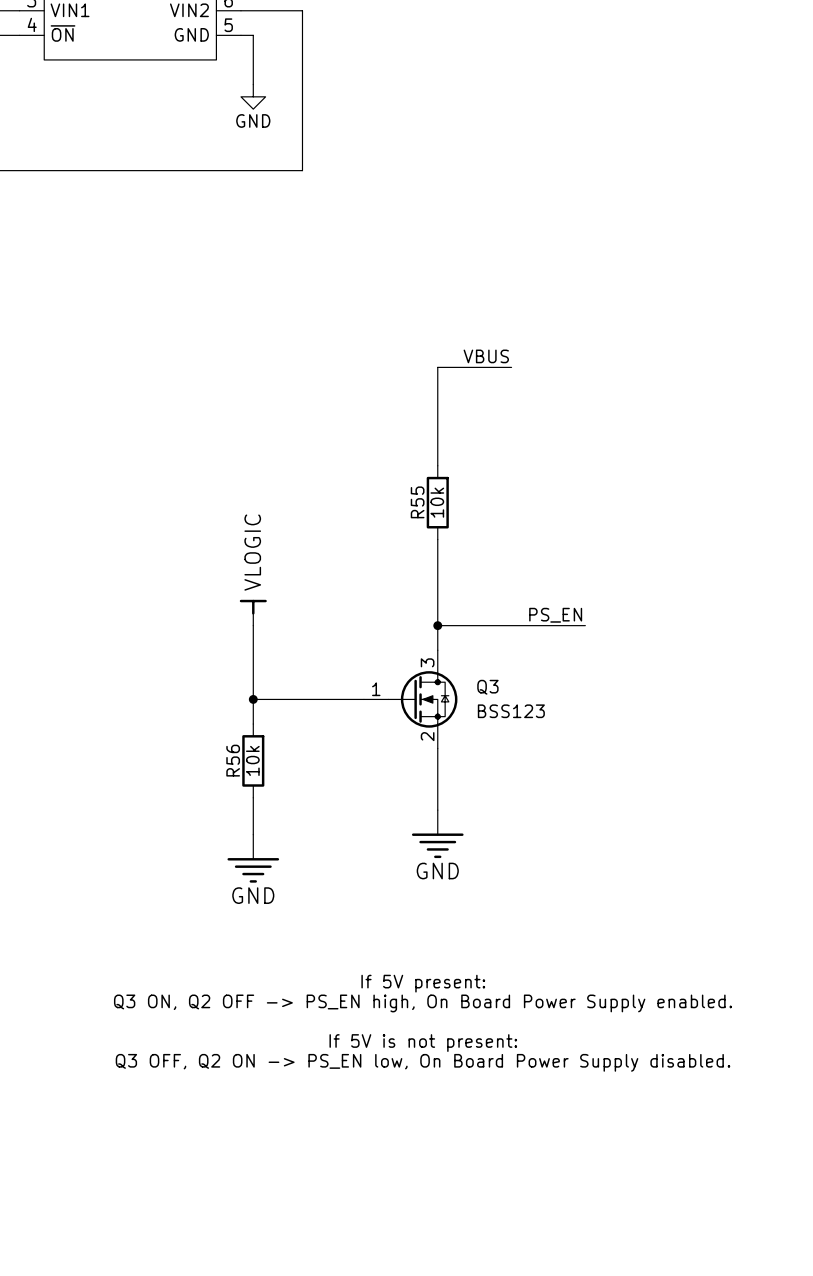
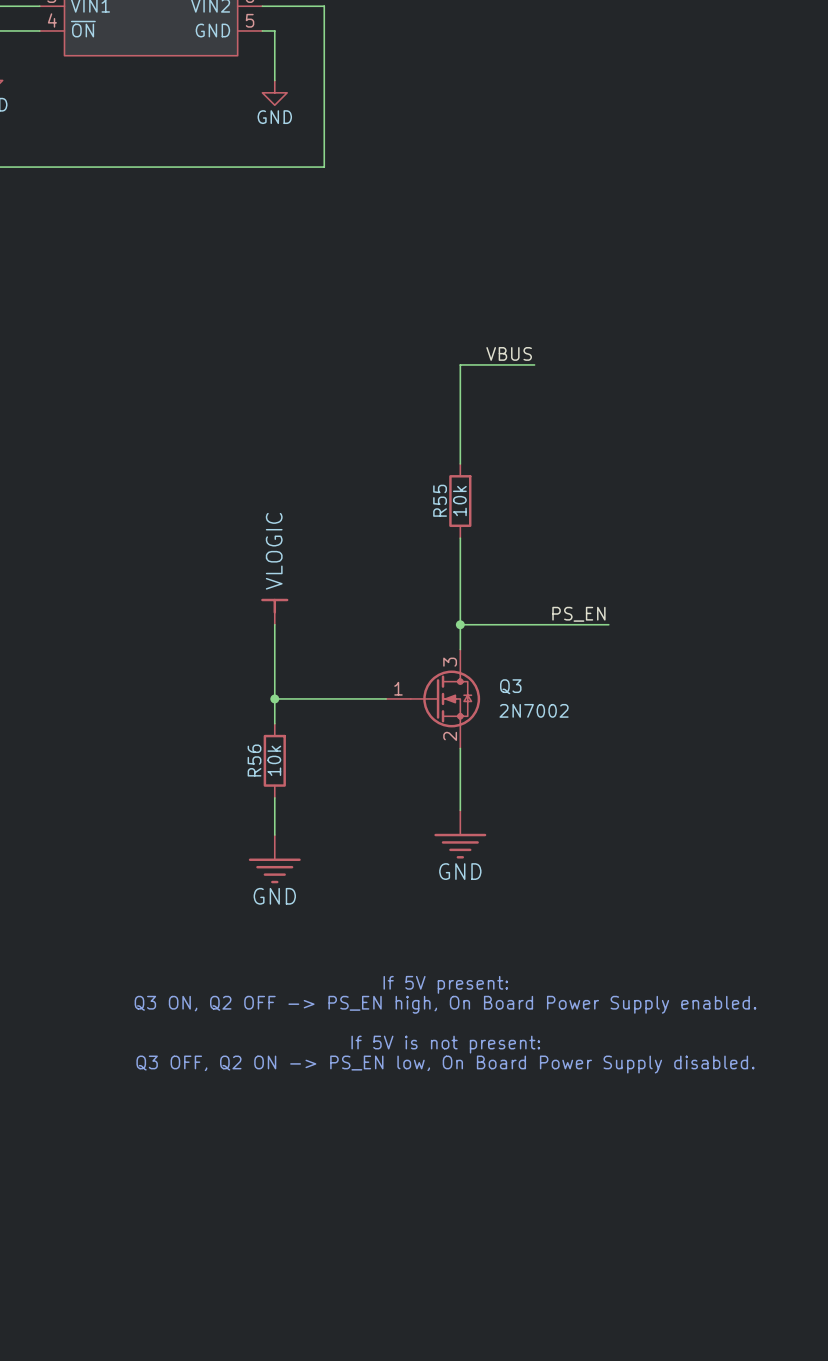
Q3 value: BSS123 (511, 711) -> 2N7002 (534, 710)

